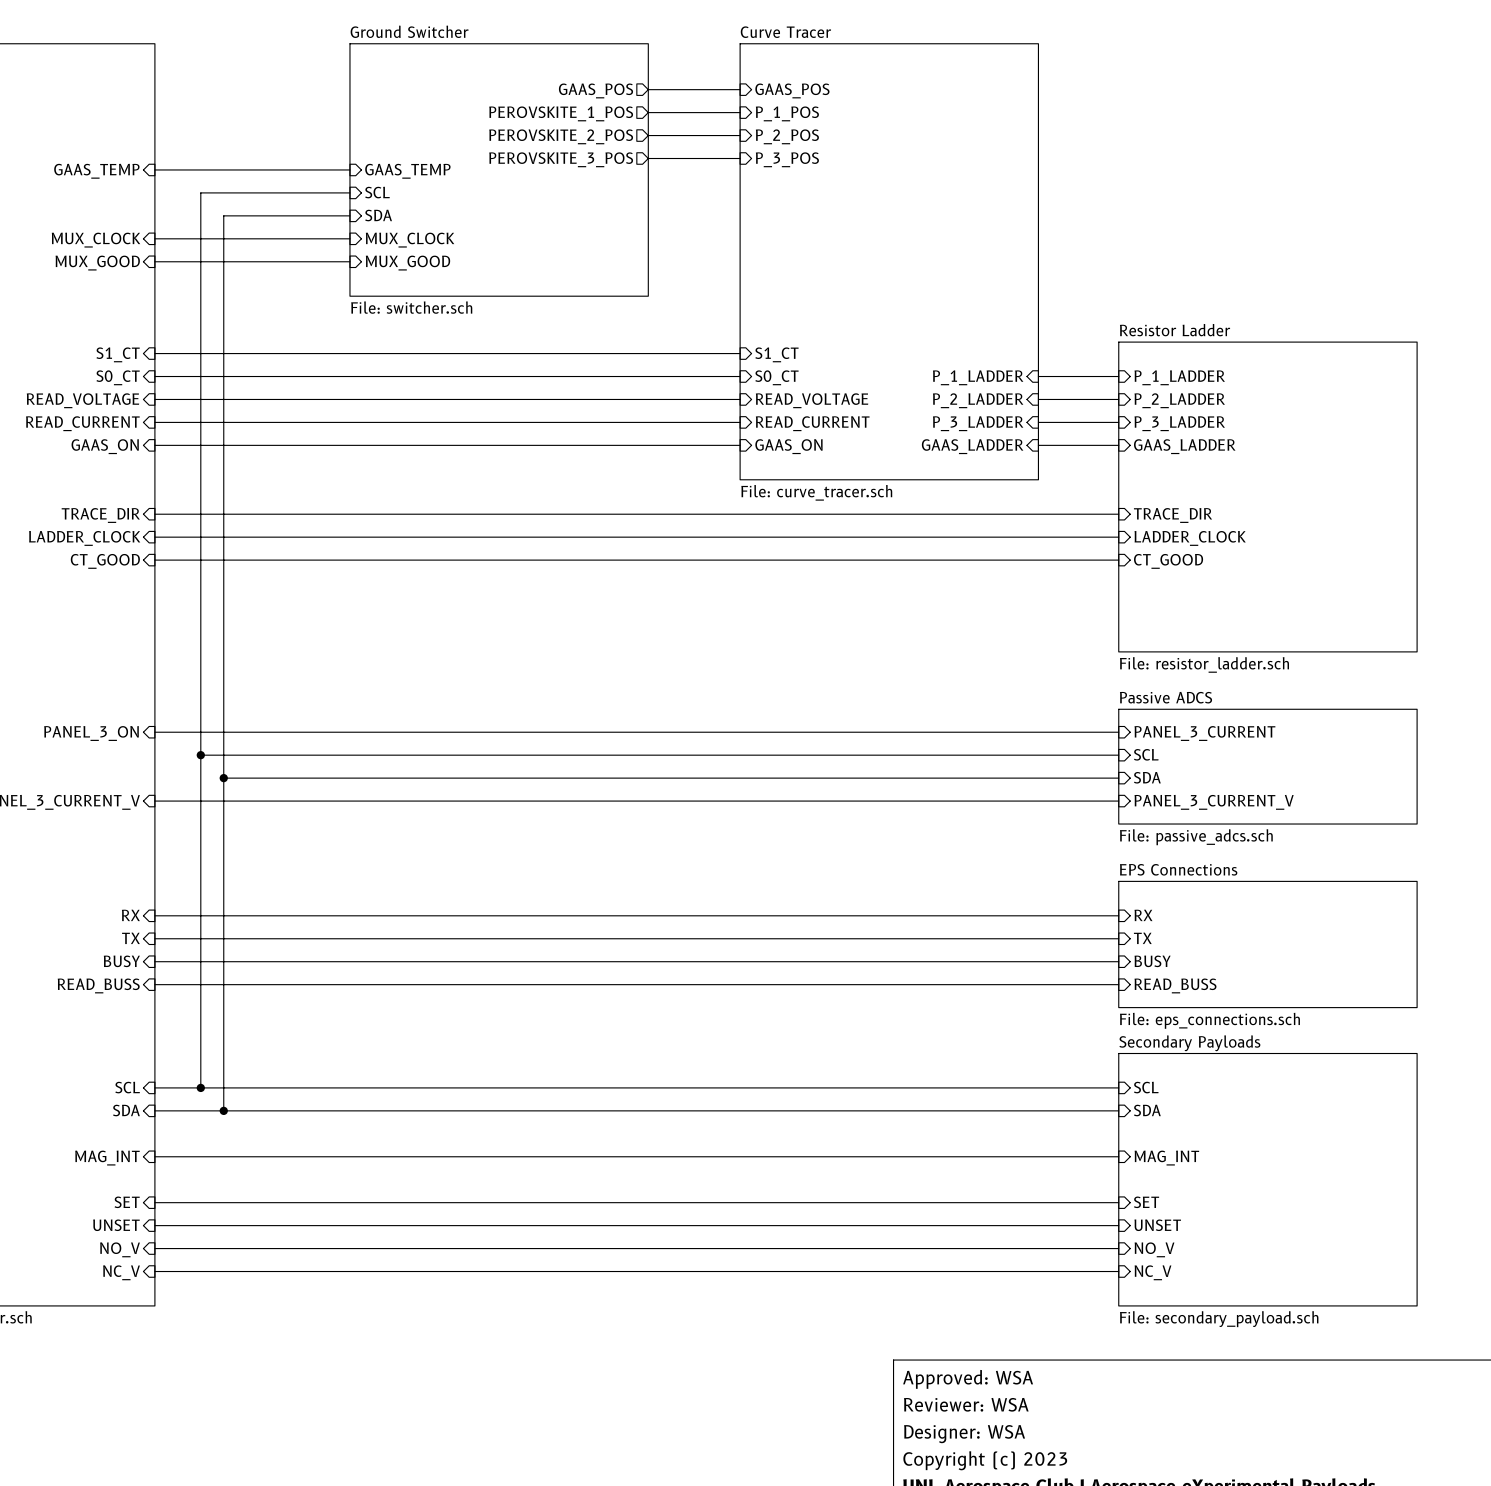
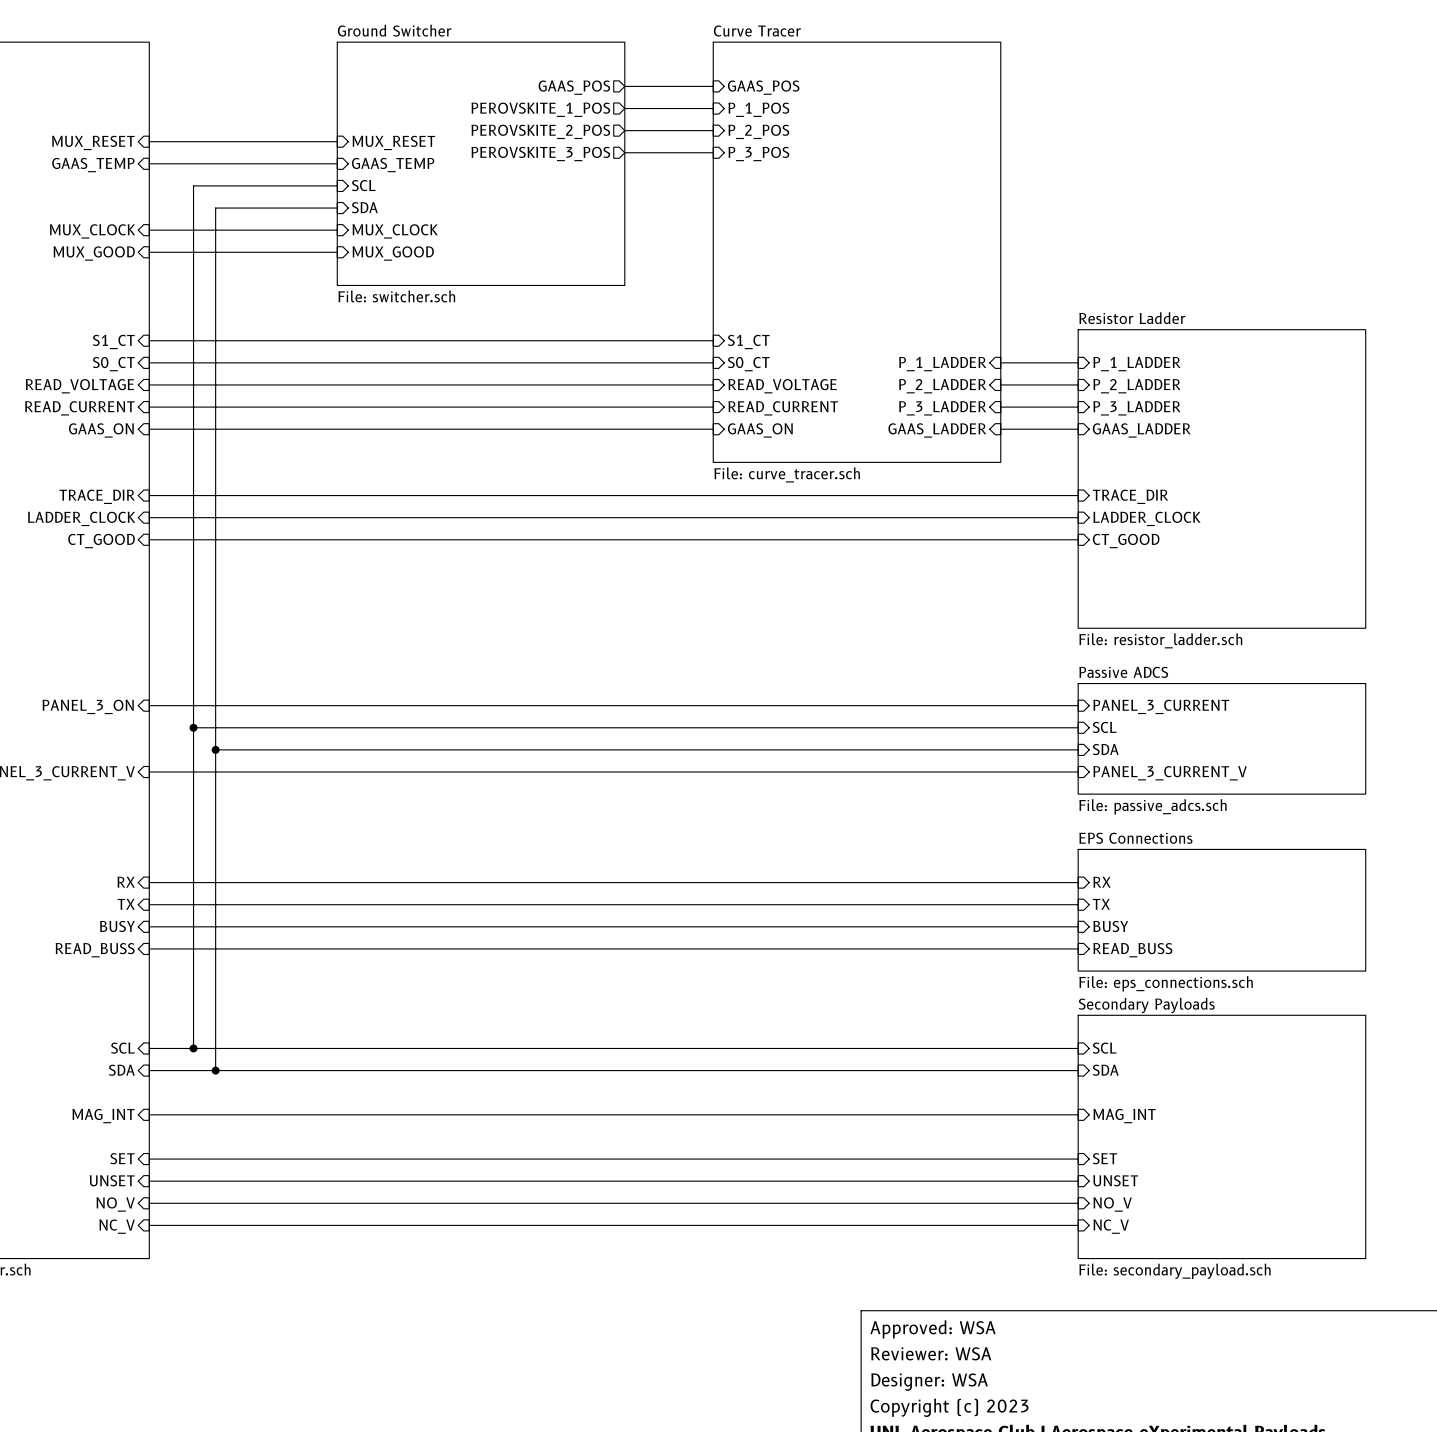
wire: none -> (149, 141) (337, 141)
sheet pin: none -> MUX_RESET (93, 142)
sheet pin: none -> MUX_RESET (393, 142)

